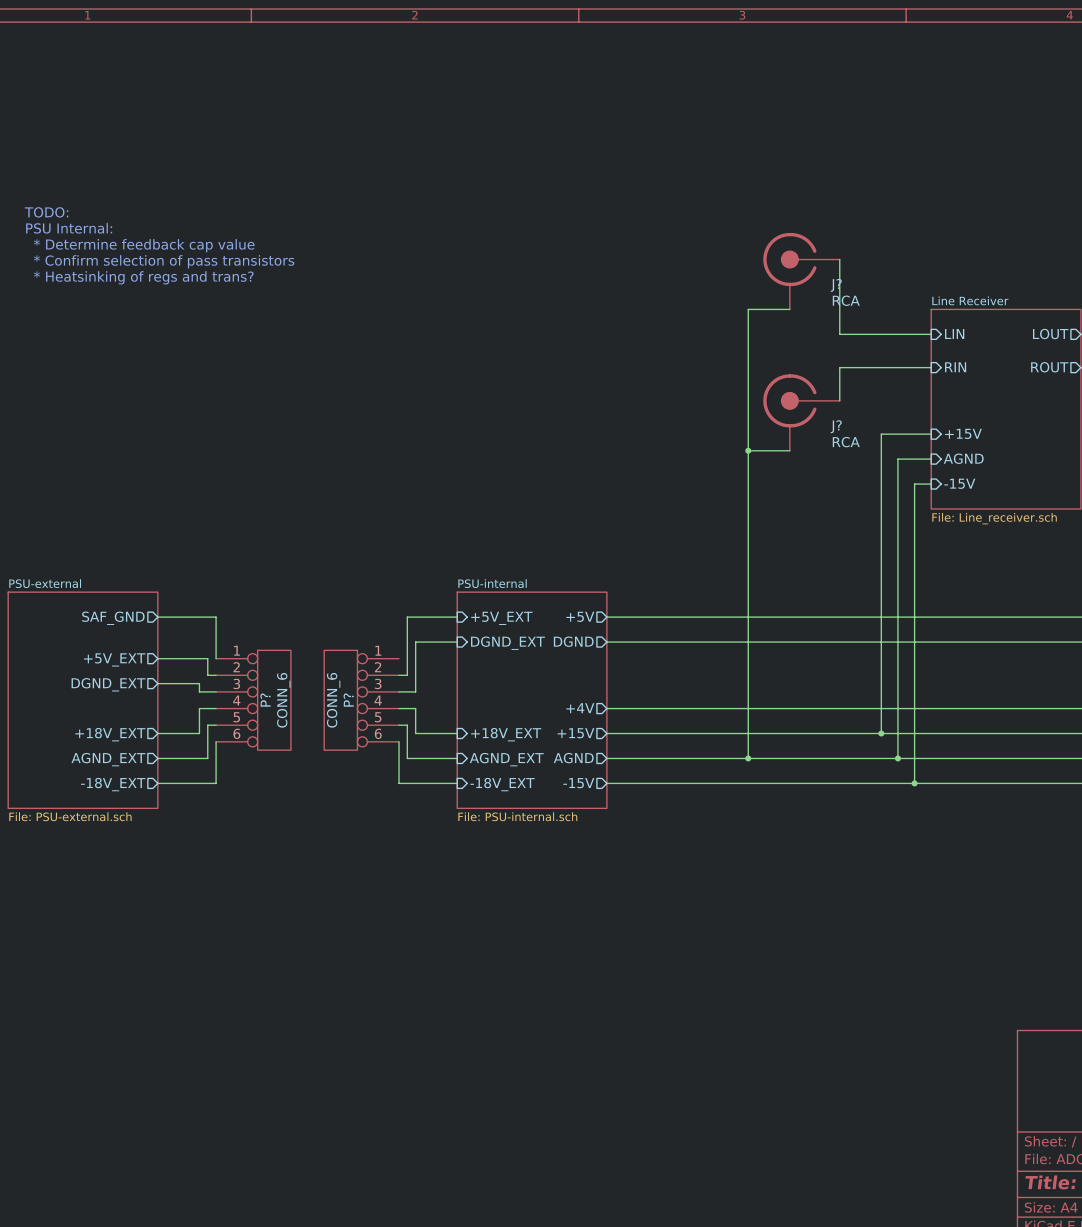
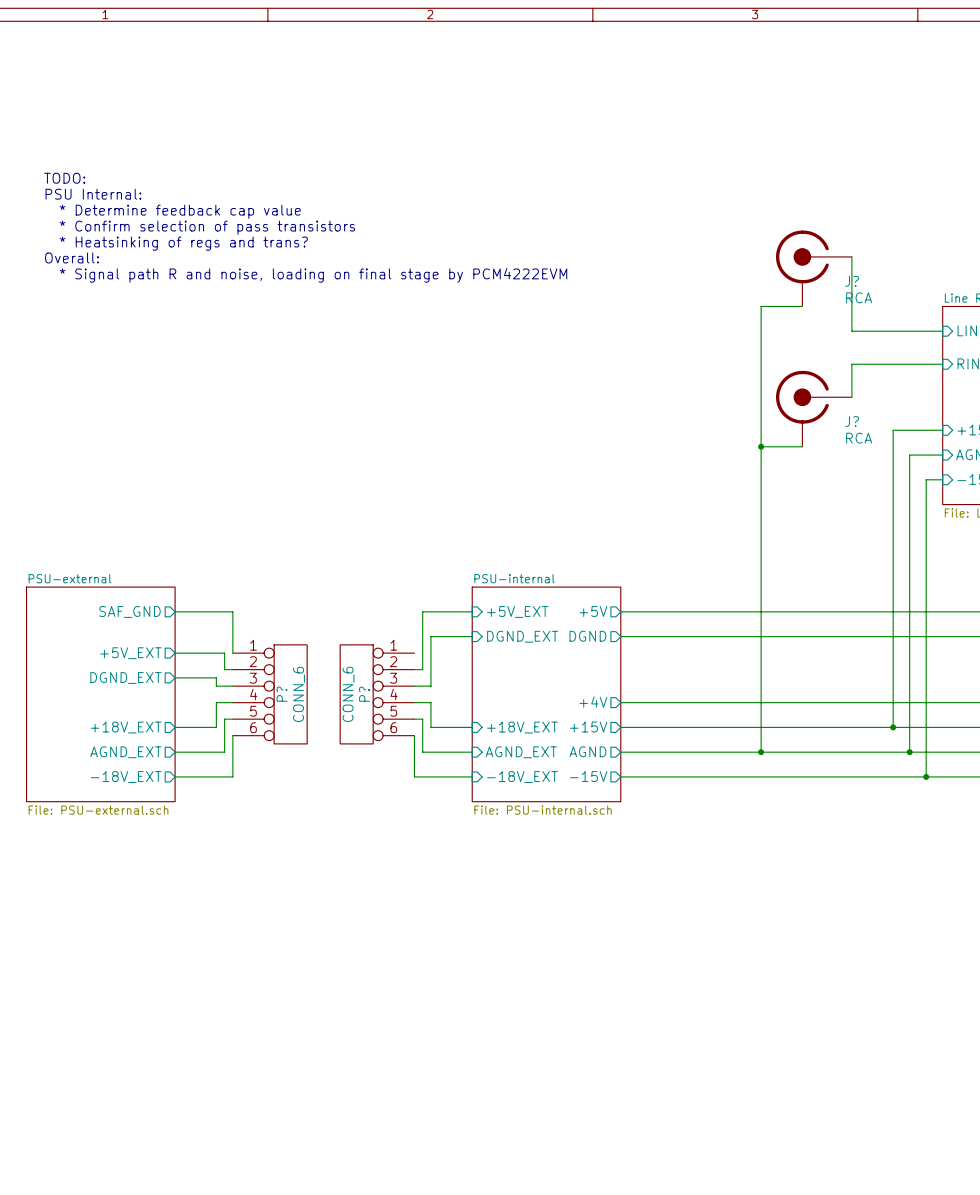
text: none -> TODO: (64, 178)
text: none -> PSU Internal: (93, 194)
text: TODO: (46, 212) -> * Determine feedback cap value (180, 211)
text: PSU Internal: (69, 228) -> * Confirm selection of pass transistors (207, 227)
text: * Determine feedback cap value (144, 245) -> * Heatsinking of regs and trans? (183, 243)
text: * Confirm selection of pass transistors (164, 261) -> Overall: (71, 257)
text: * Heatsinking of regs and trans? (143, 277) -> * Signal path R and noise, loading on final stage by PCM4222EVM (313, 275)

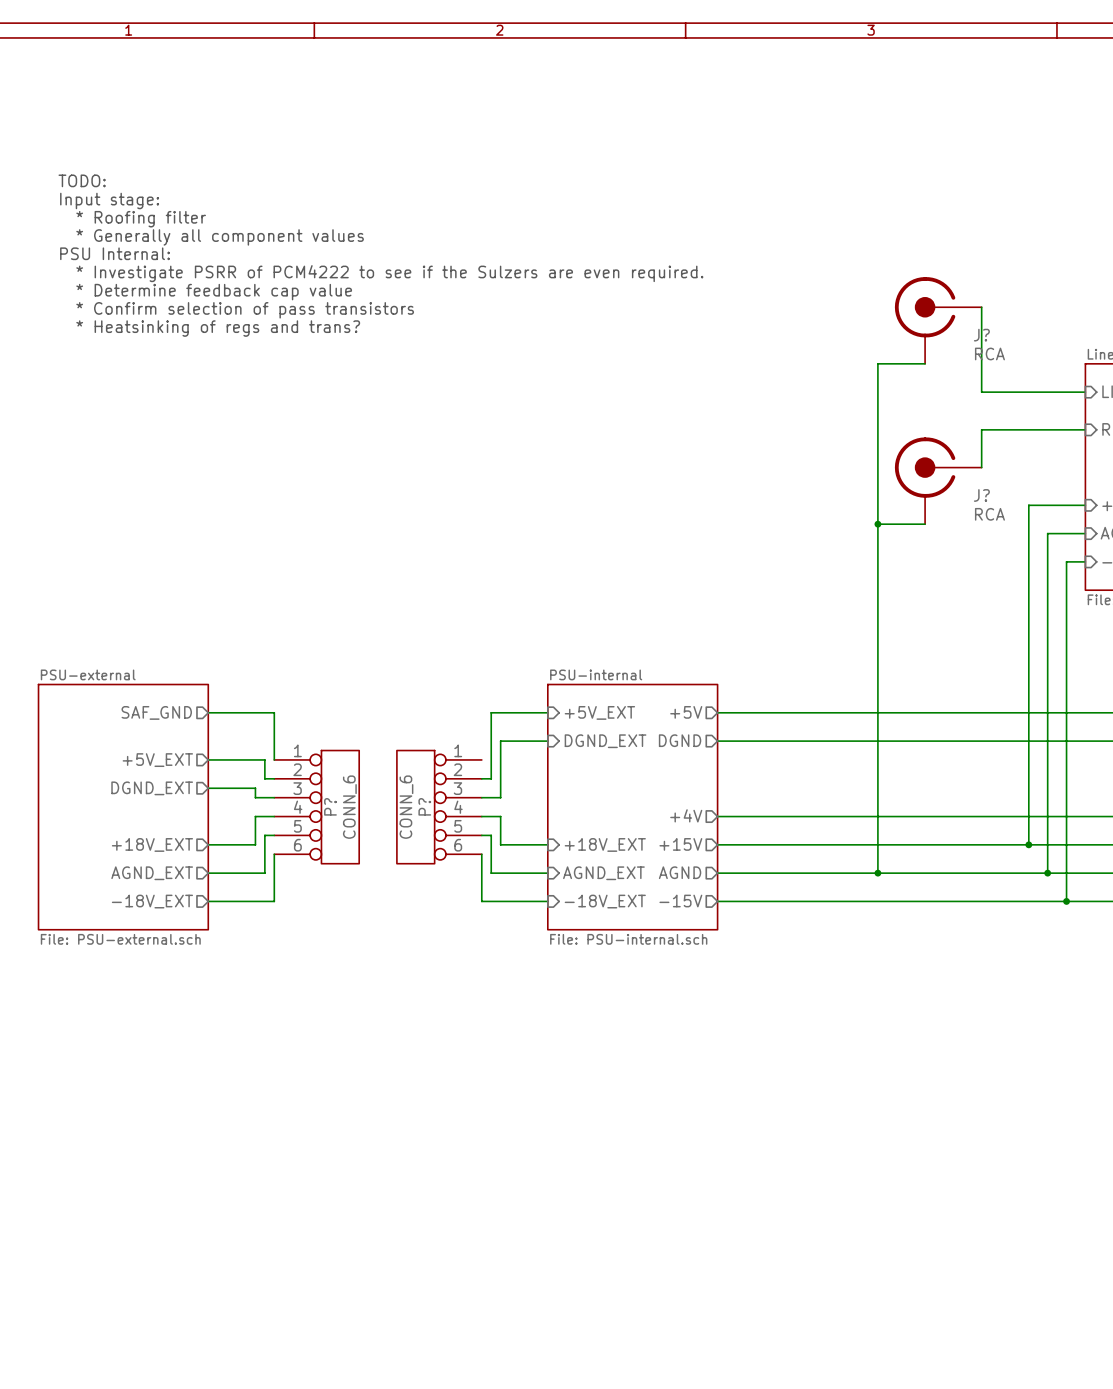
text: none -> TODO: (82, 180)
text: none -> Input stage: (109, 200)
text: TODO: (64, 178) -> * Roofing filter (141, 219)
text: PSU Internal: (93, 194) -> * Generally all component values (220, 237)
text: * Determine feedback cap value (180, 211) -> PSU Internal: (114, 253)
text: * Confirm selection of pass transistors (207, 227) -> * Investigate PSRR of PCM4222 to see if the Sulzers are even required. (389, 273)
text: * Heatsinking of regs and trans? (183, 243) -> * Determine feedback cap value (214, 292)
text: Overall: (71, 257) -> * Confirm selection of pass transistors (245, 310)
text: * Signal path R and noise, loading on final stage by PCM4222EVM (313, 275) -> * Heatsinking of regs and trans? (218, 328)

